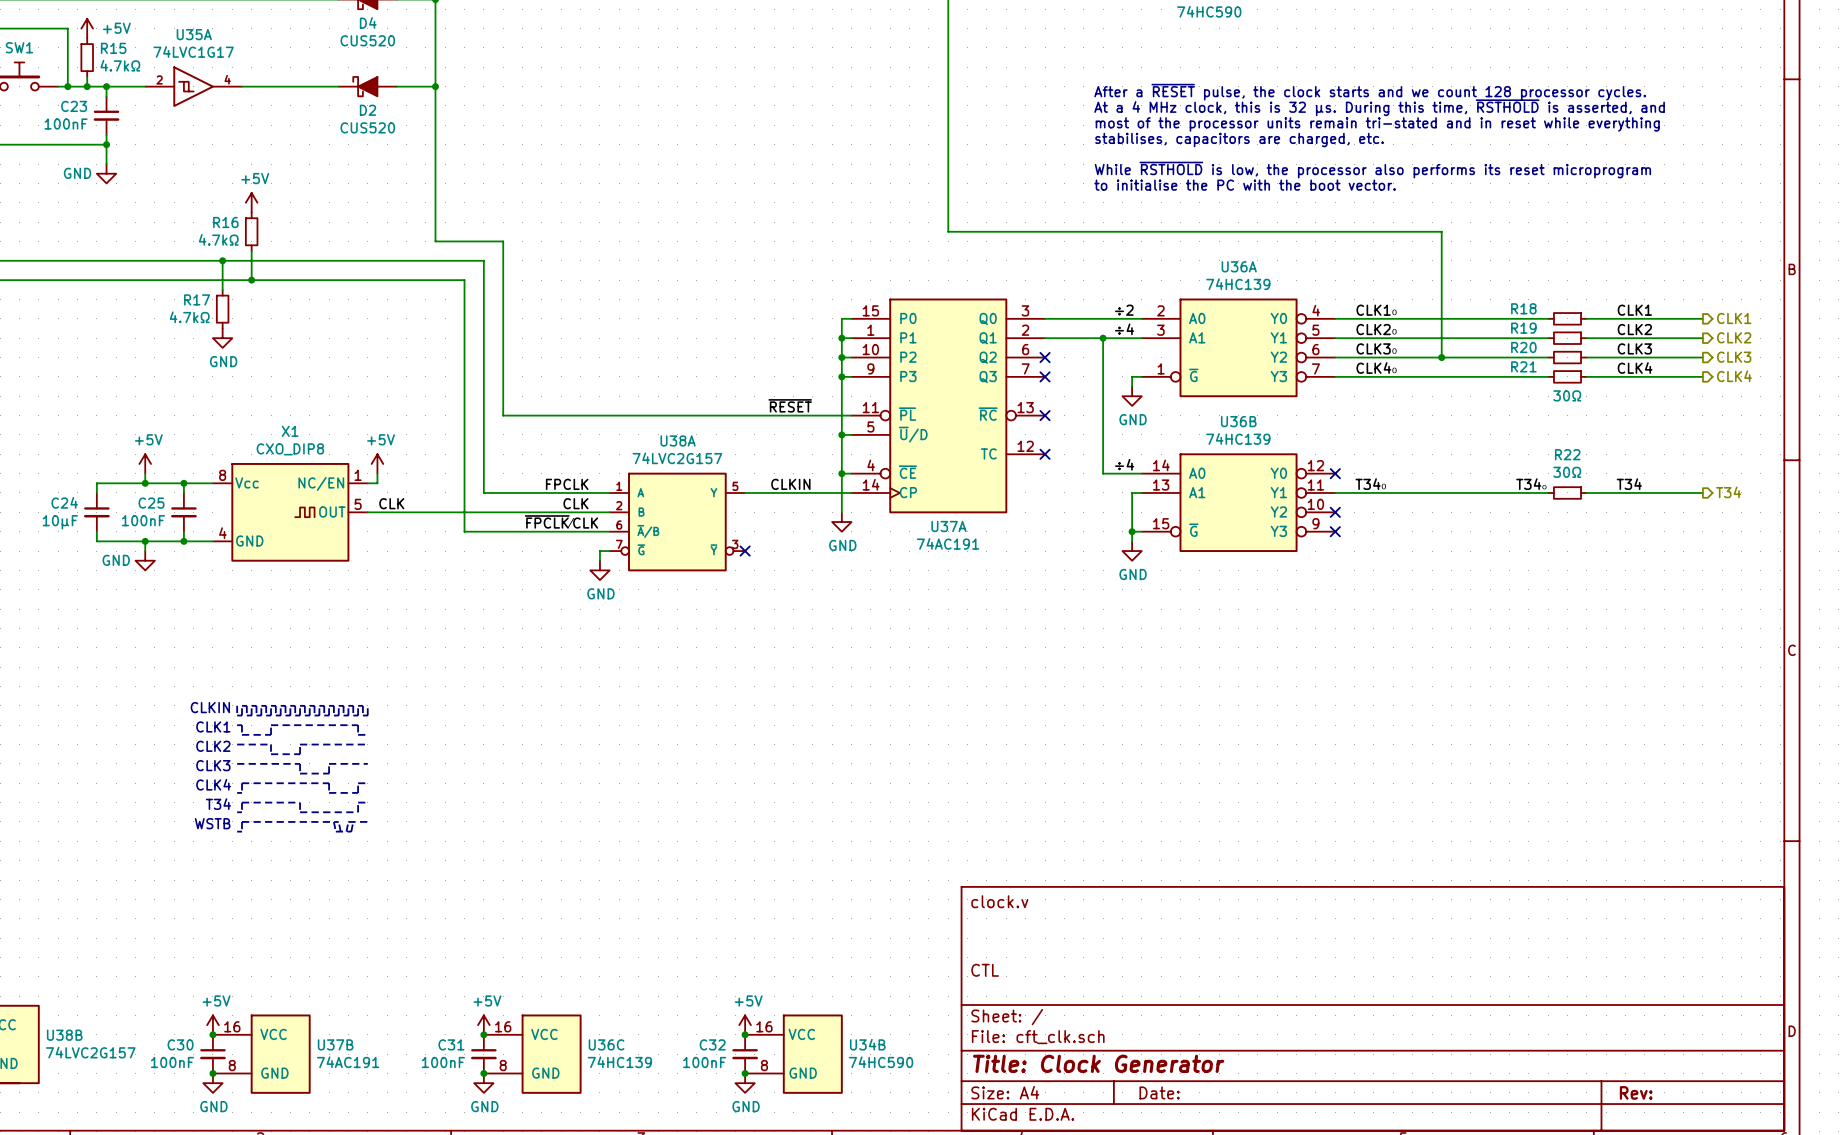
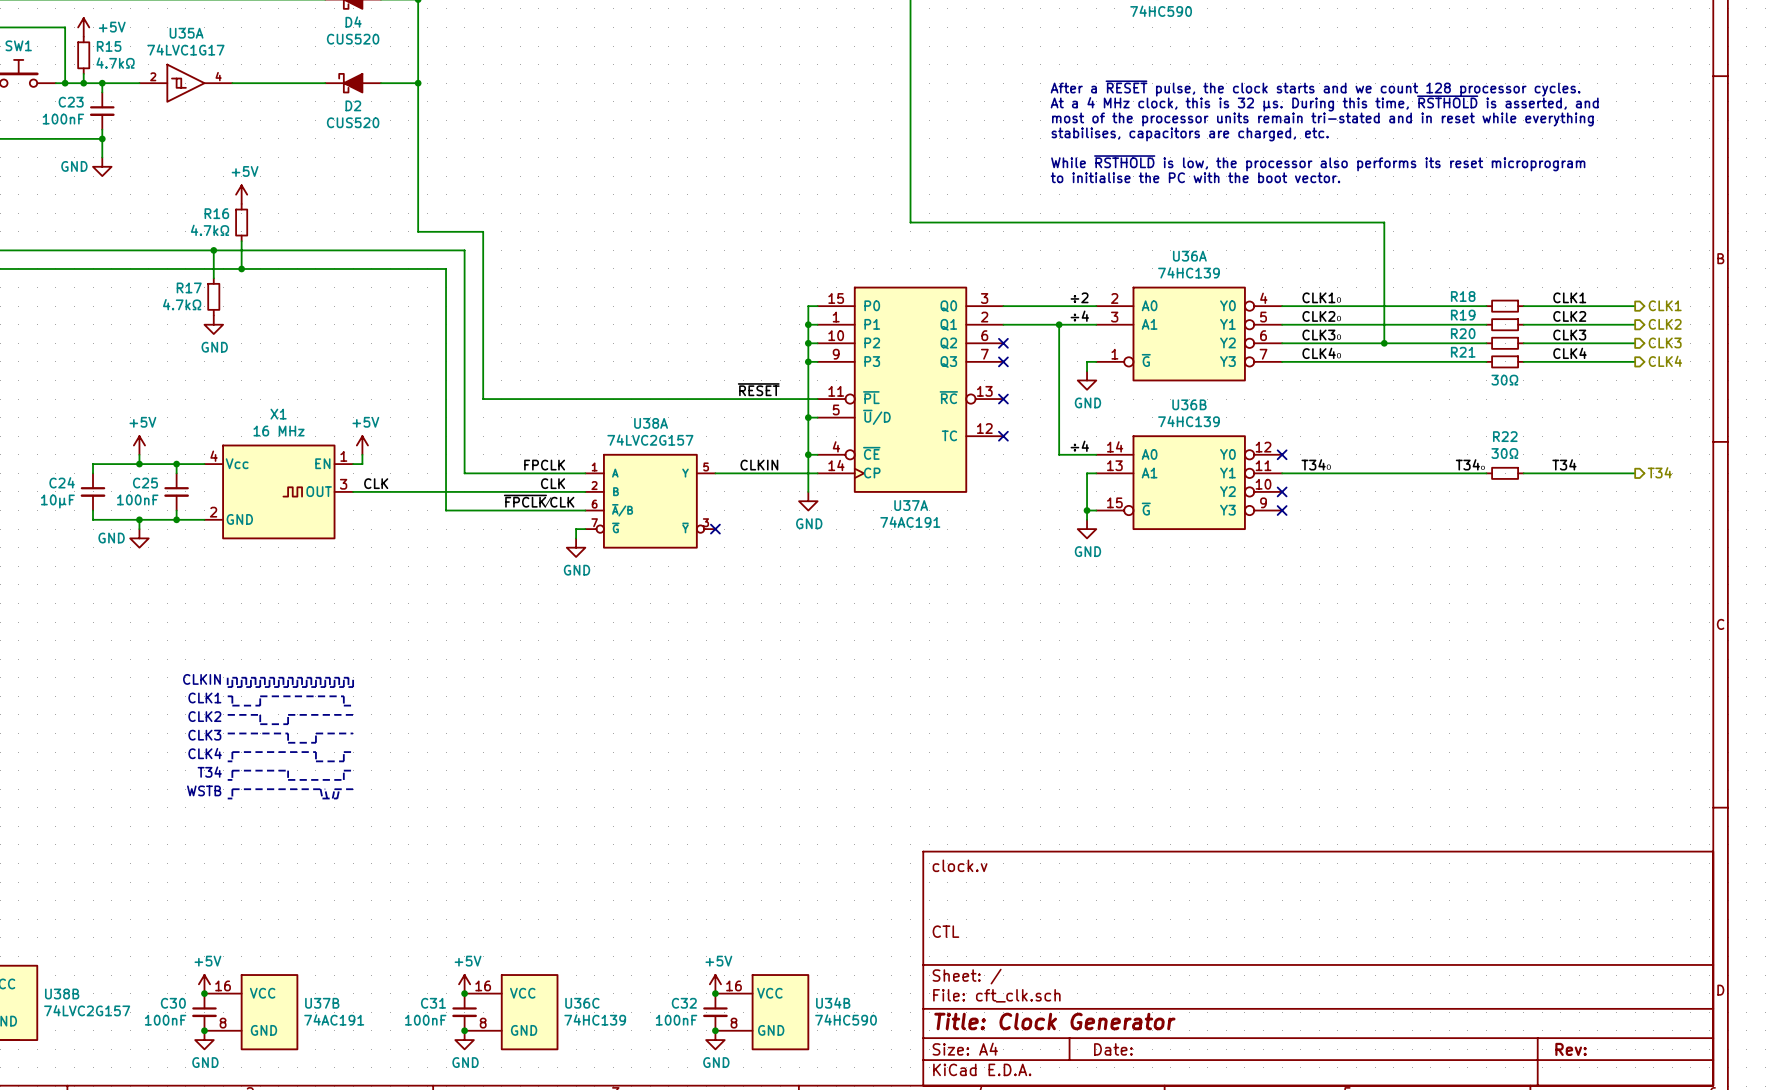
X1 value: CXO_DIP8 (290, 449) -> 16 MHz (279, 431)
X1 pin number: 8 (222, 475) -> 4 (213, 456)
X1 pin name: NC/EN (321, 483) -> EN (322, 463)
X1 pin number: 5 (358, 504) -> 3 (343, 484)
X1 pin number: 4 (222, 533) -> 2 (213, 512)

